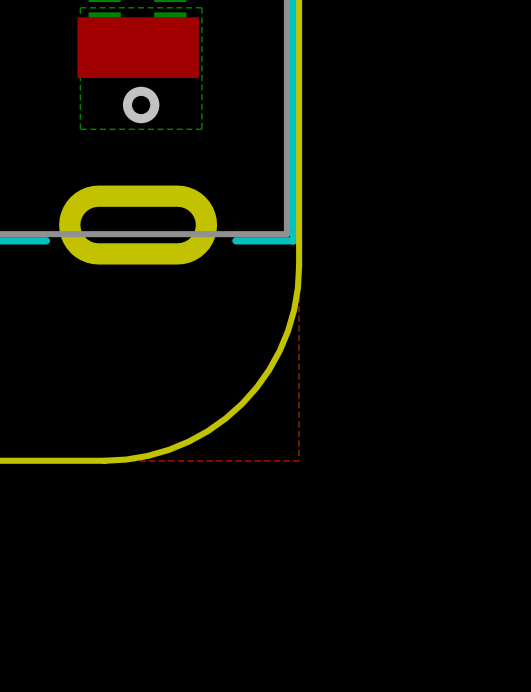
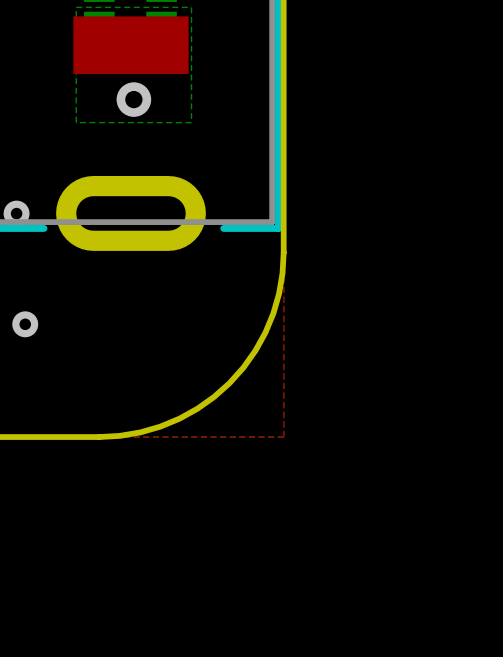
via: none -> (16, 213)
via: none -> (25, 324)

